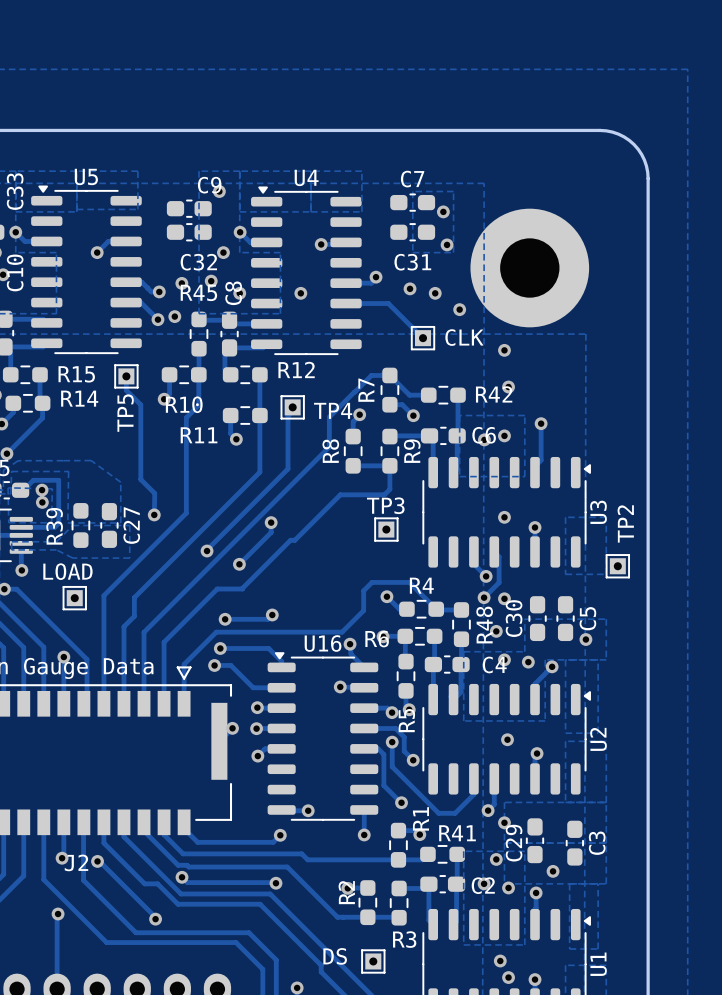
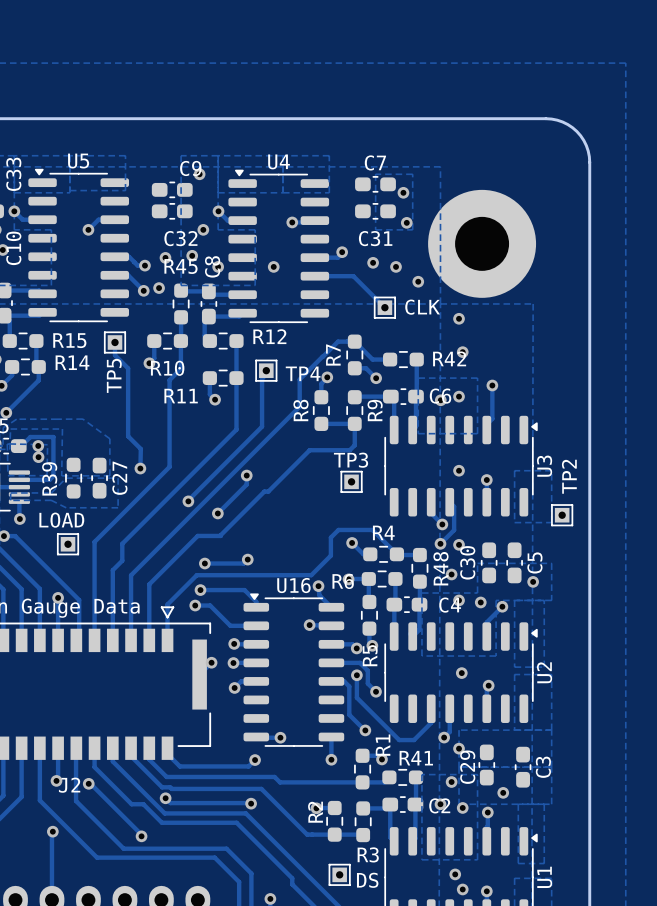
DS name position: DS (335, 956) -> DS (367, 880)

